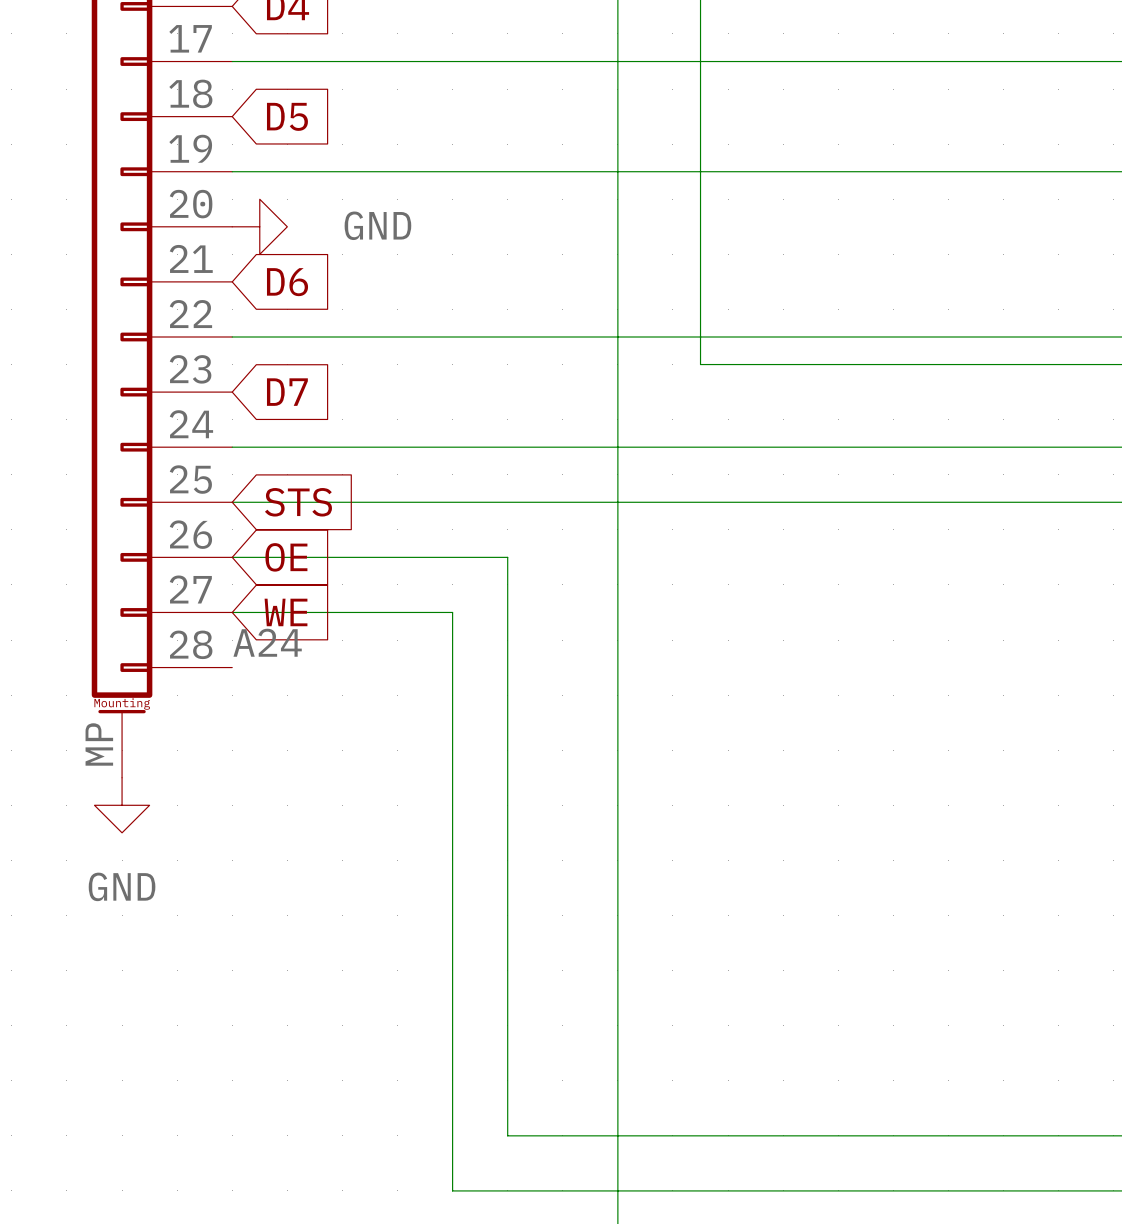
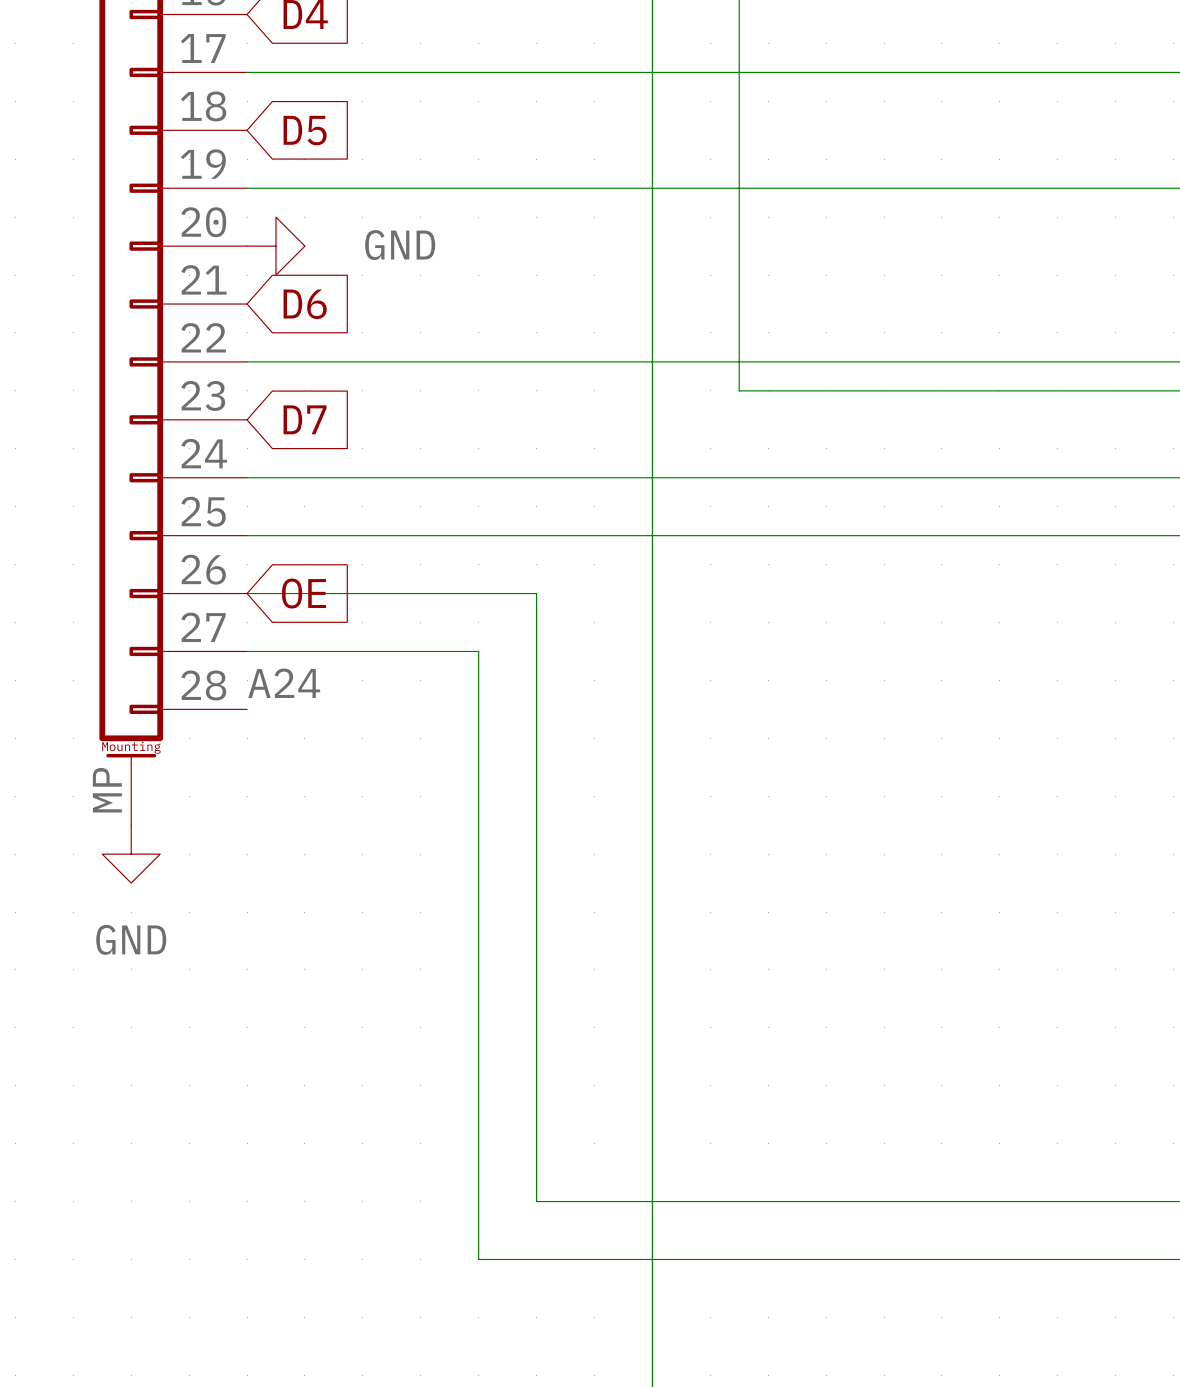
global label: STS (298, 502) -> none
global label: WE (286, 612) -> none

